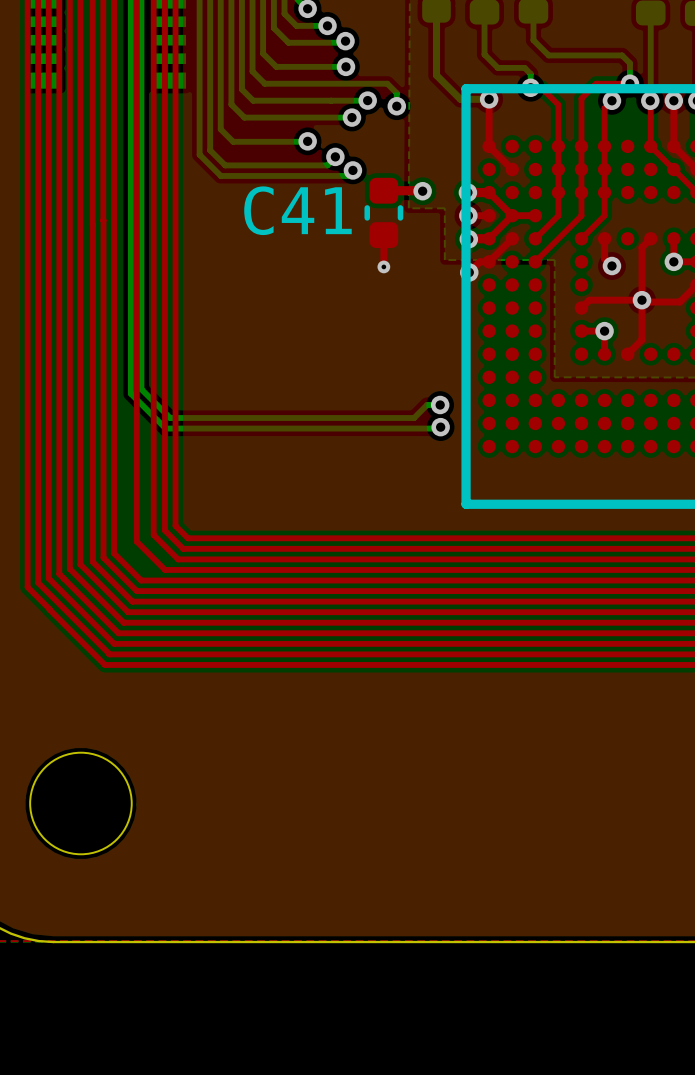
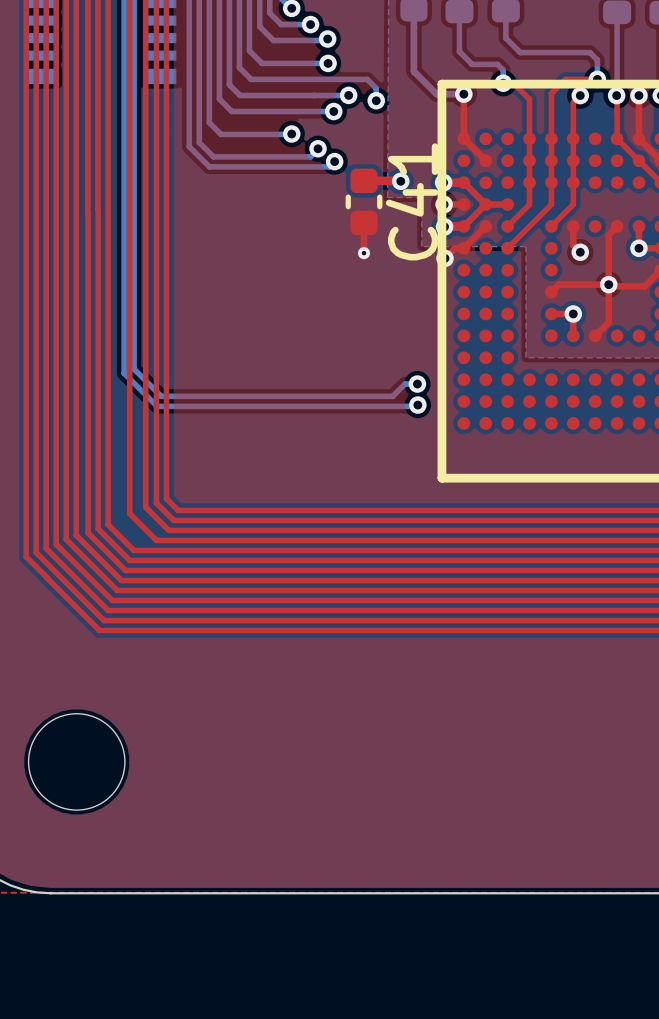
C41 name rotation: 0° (297, 210) -> 90° counterclockwise (412, 201)

